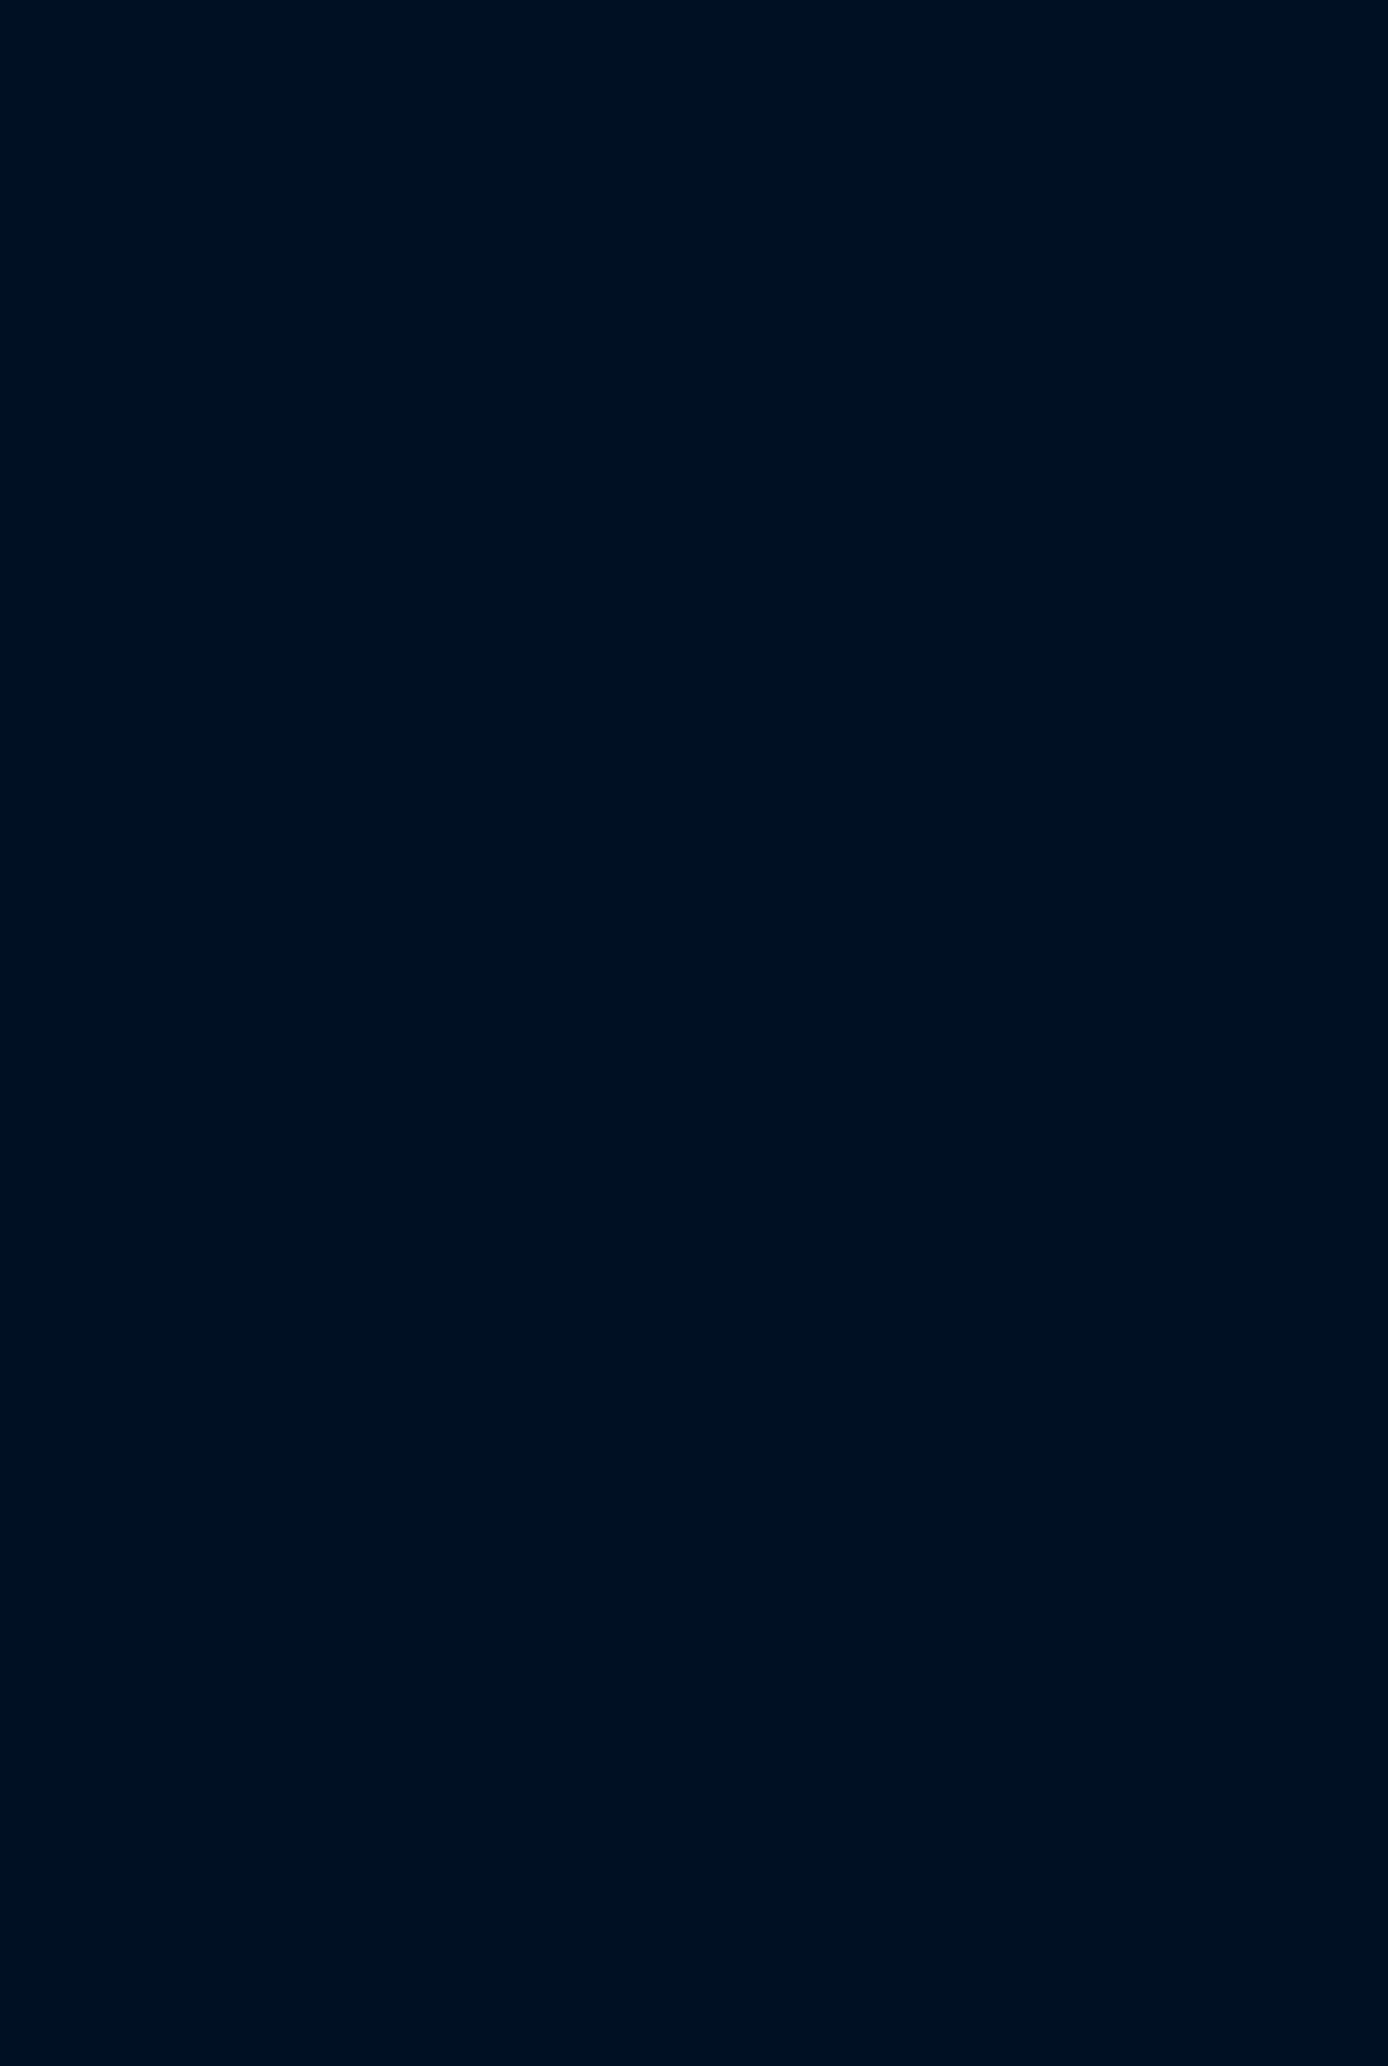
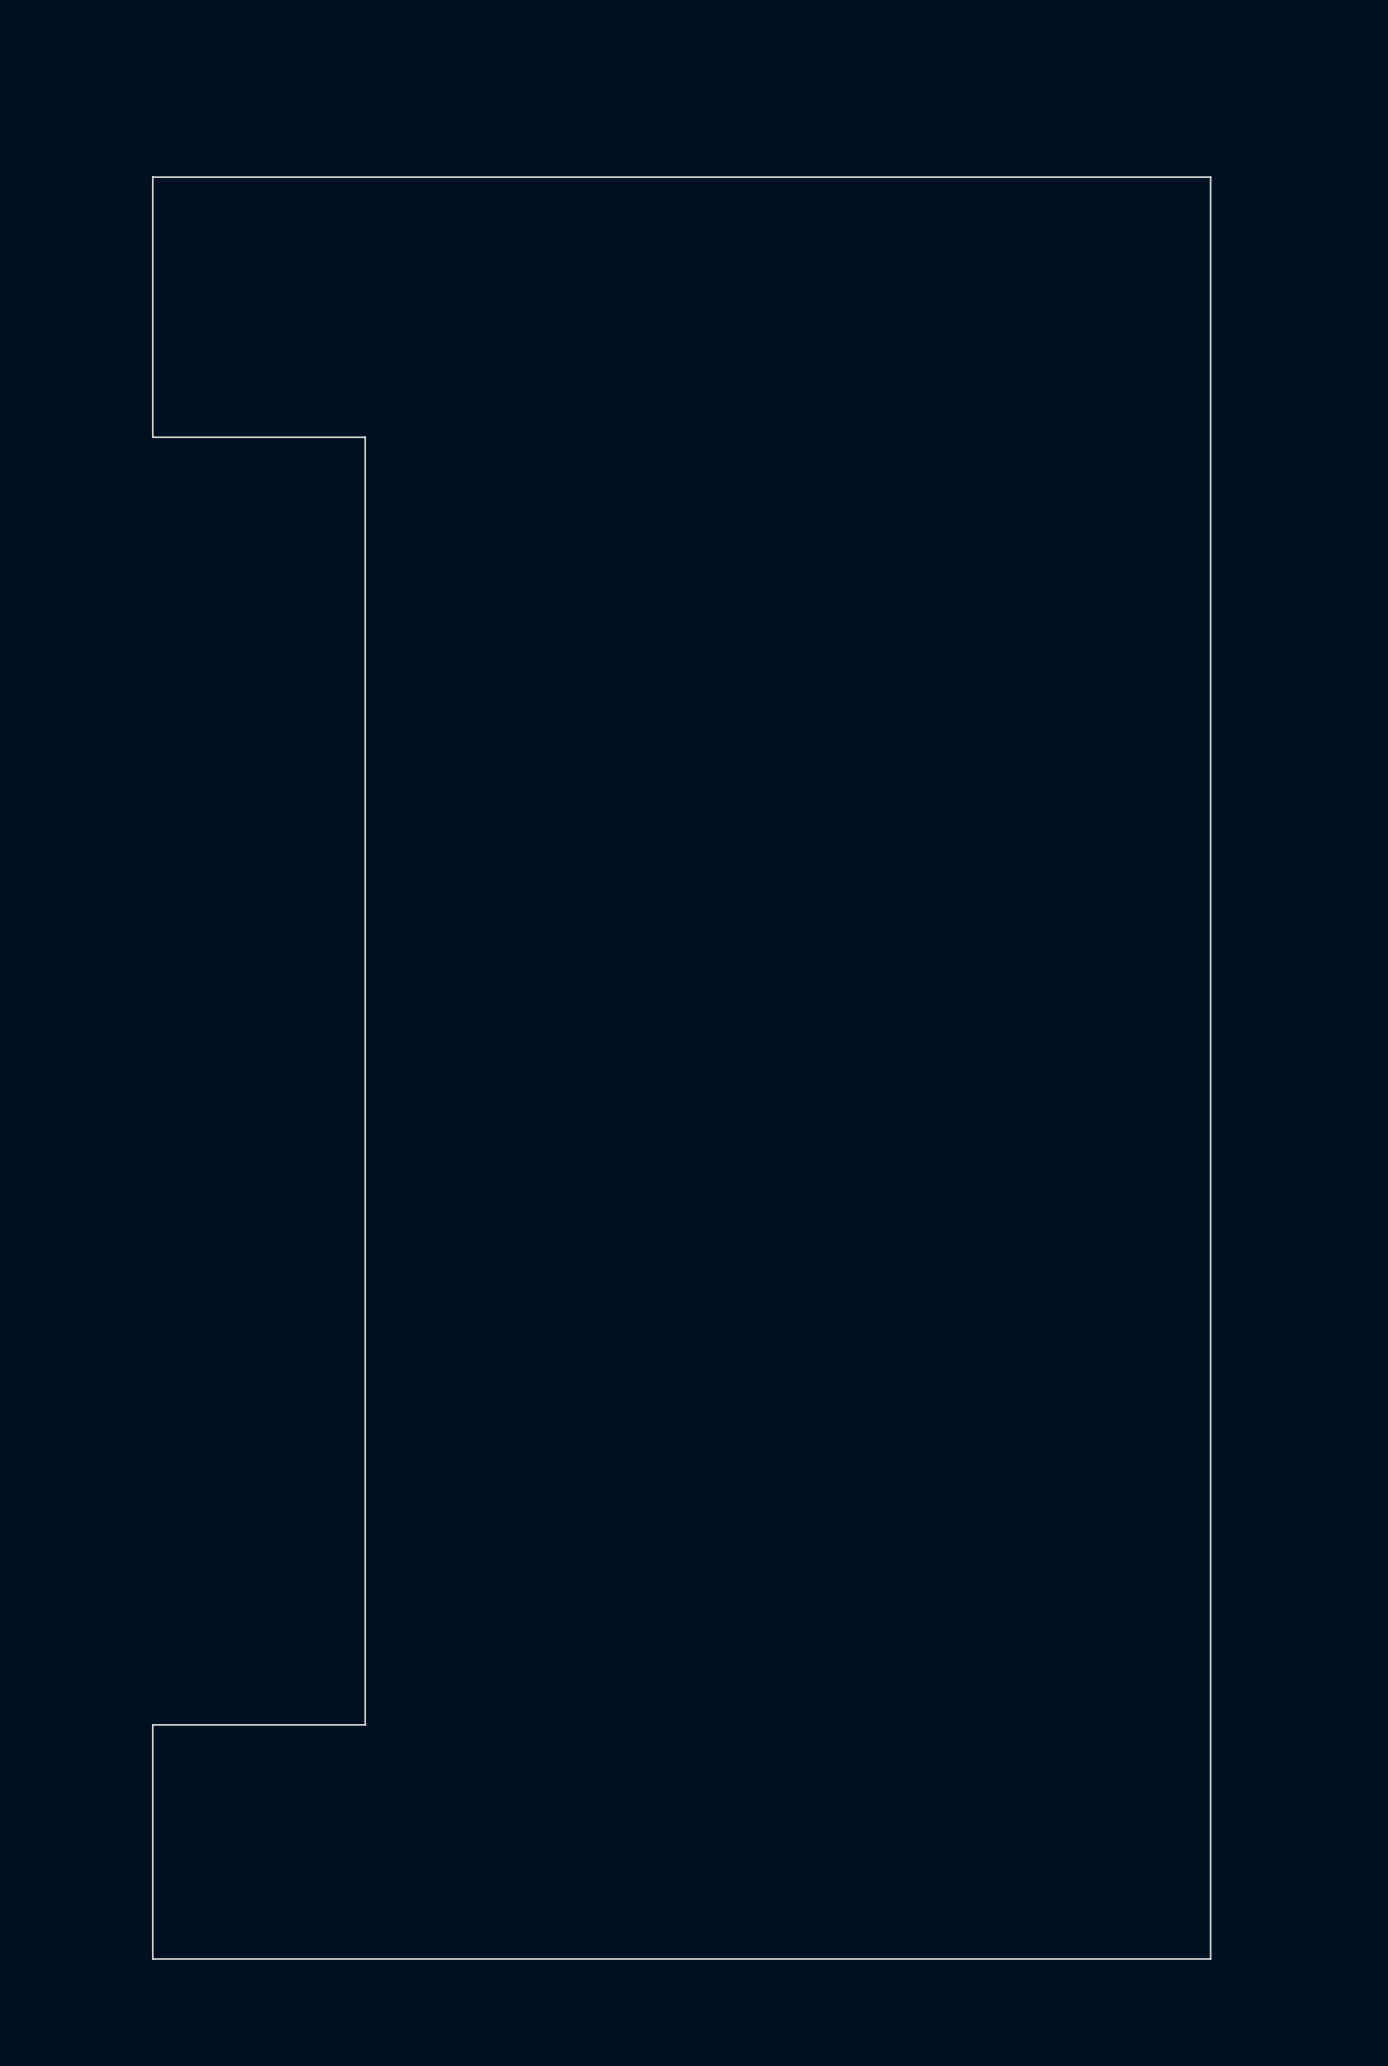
board edge: none -> (1210, 177) (152, 177) (152, 437) (365, 437) (365, 1724) (152, 1724) (152, 1958) (1210, 1958) (1210, 177)

